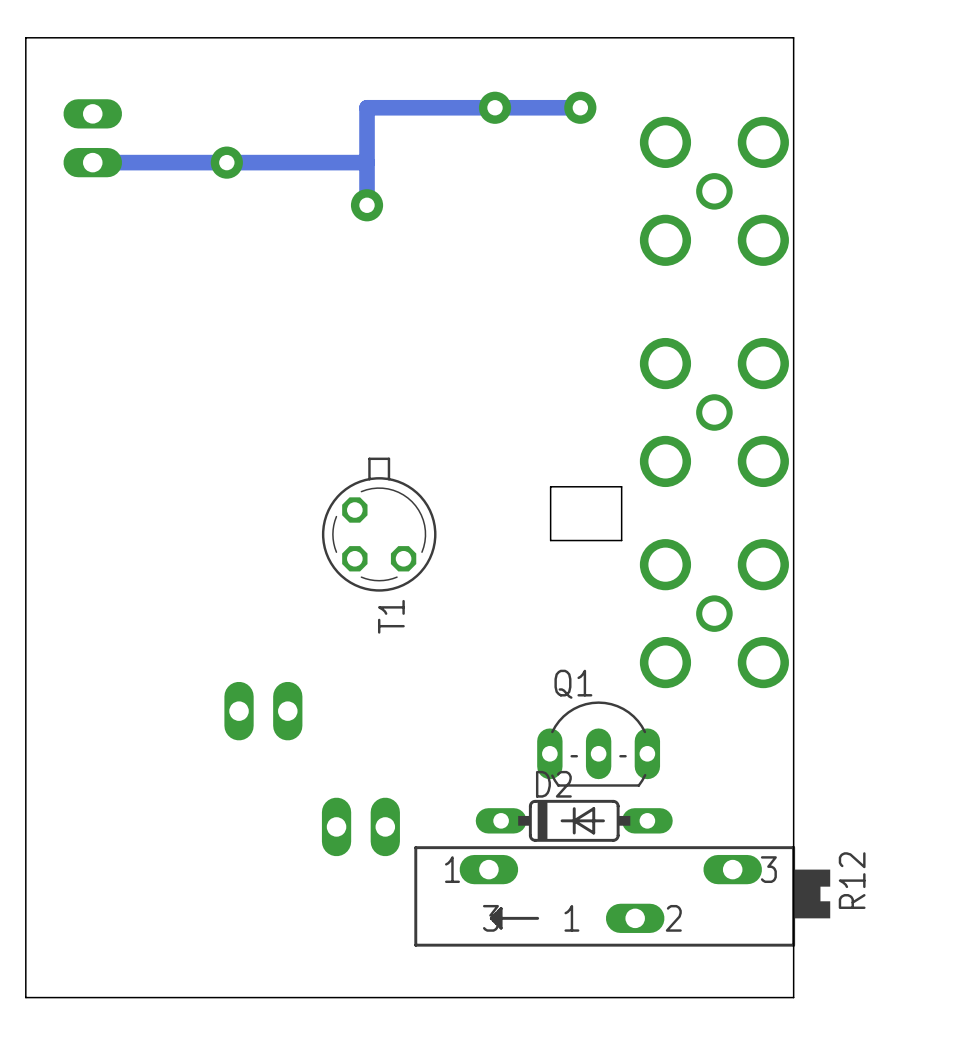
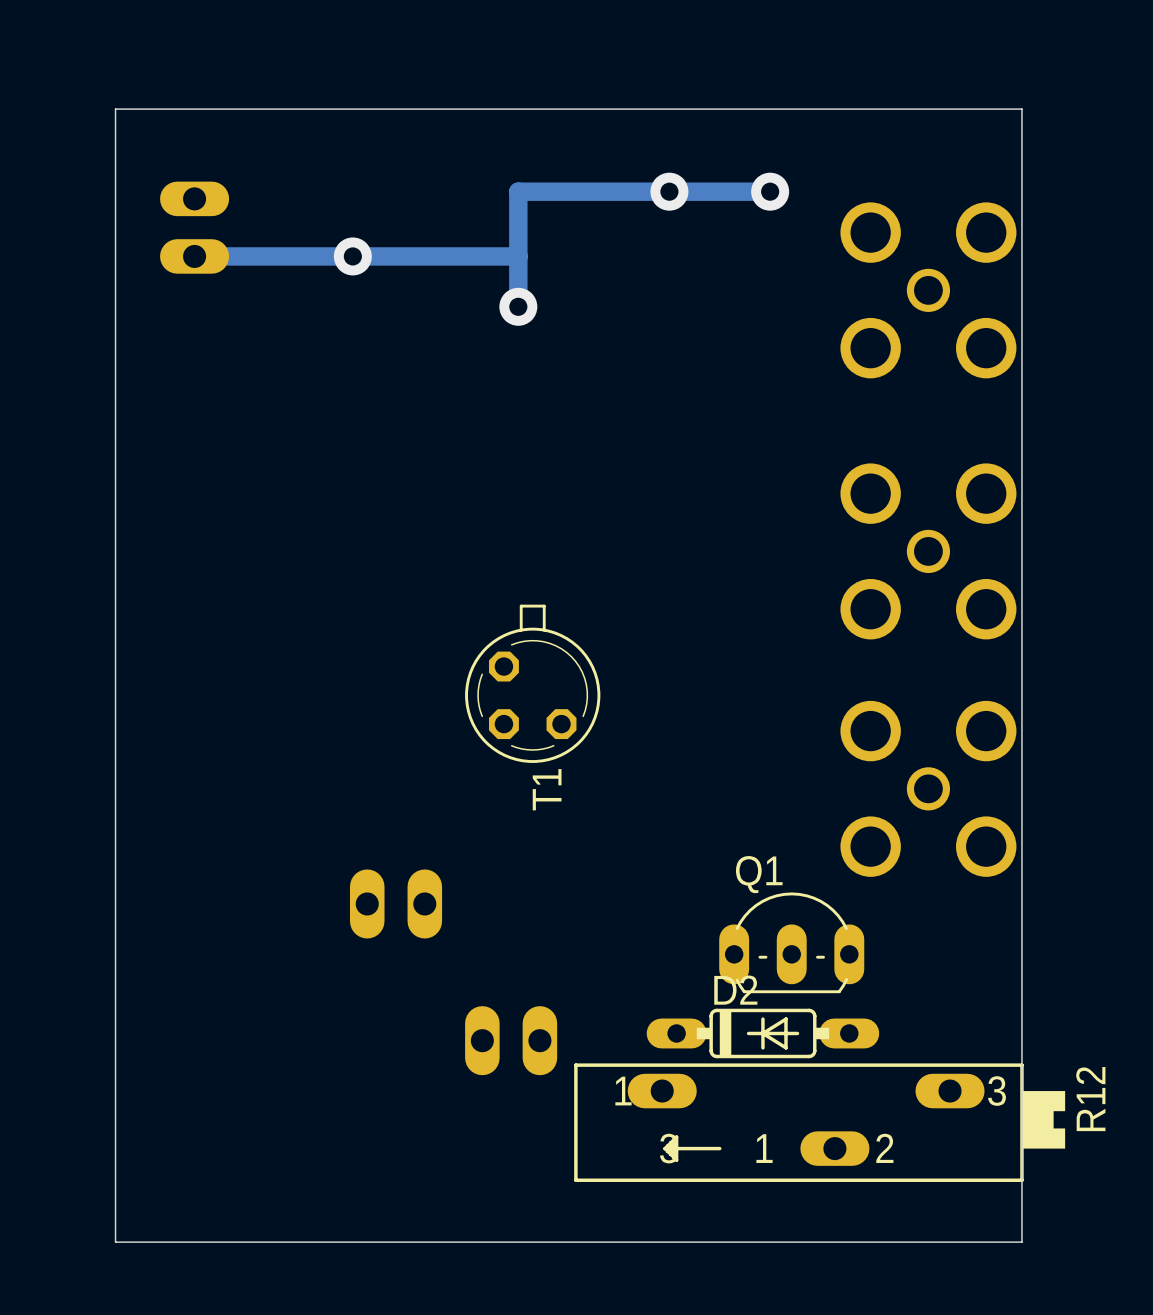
part: (586, 513) -> none

